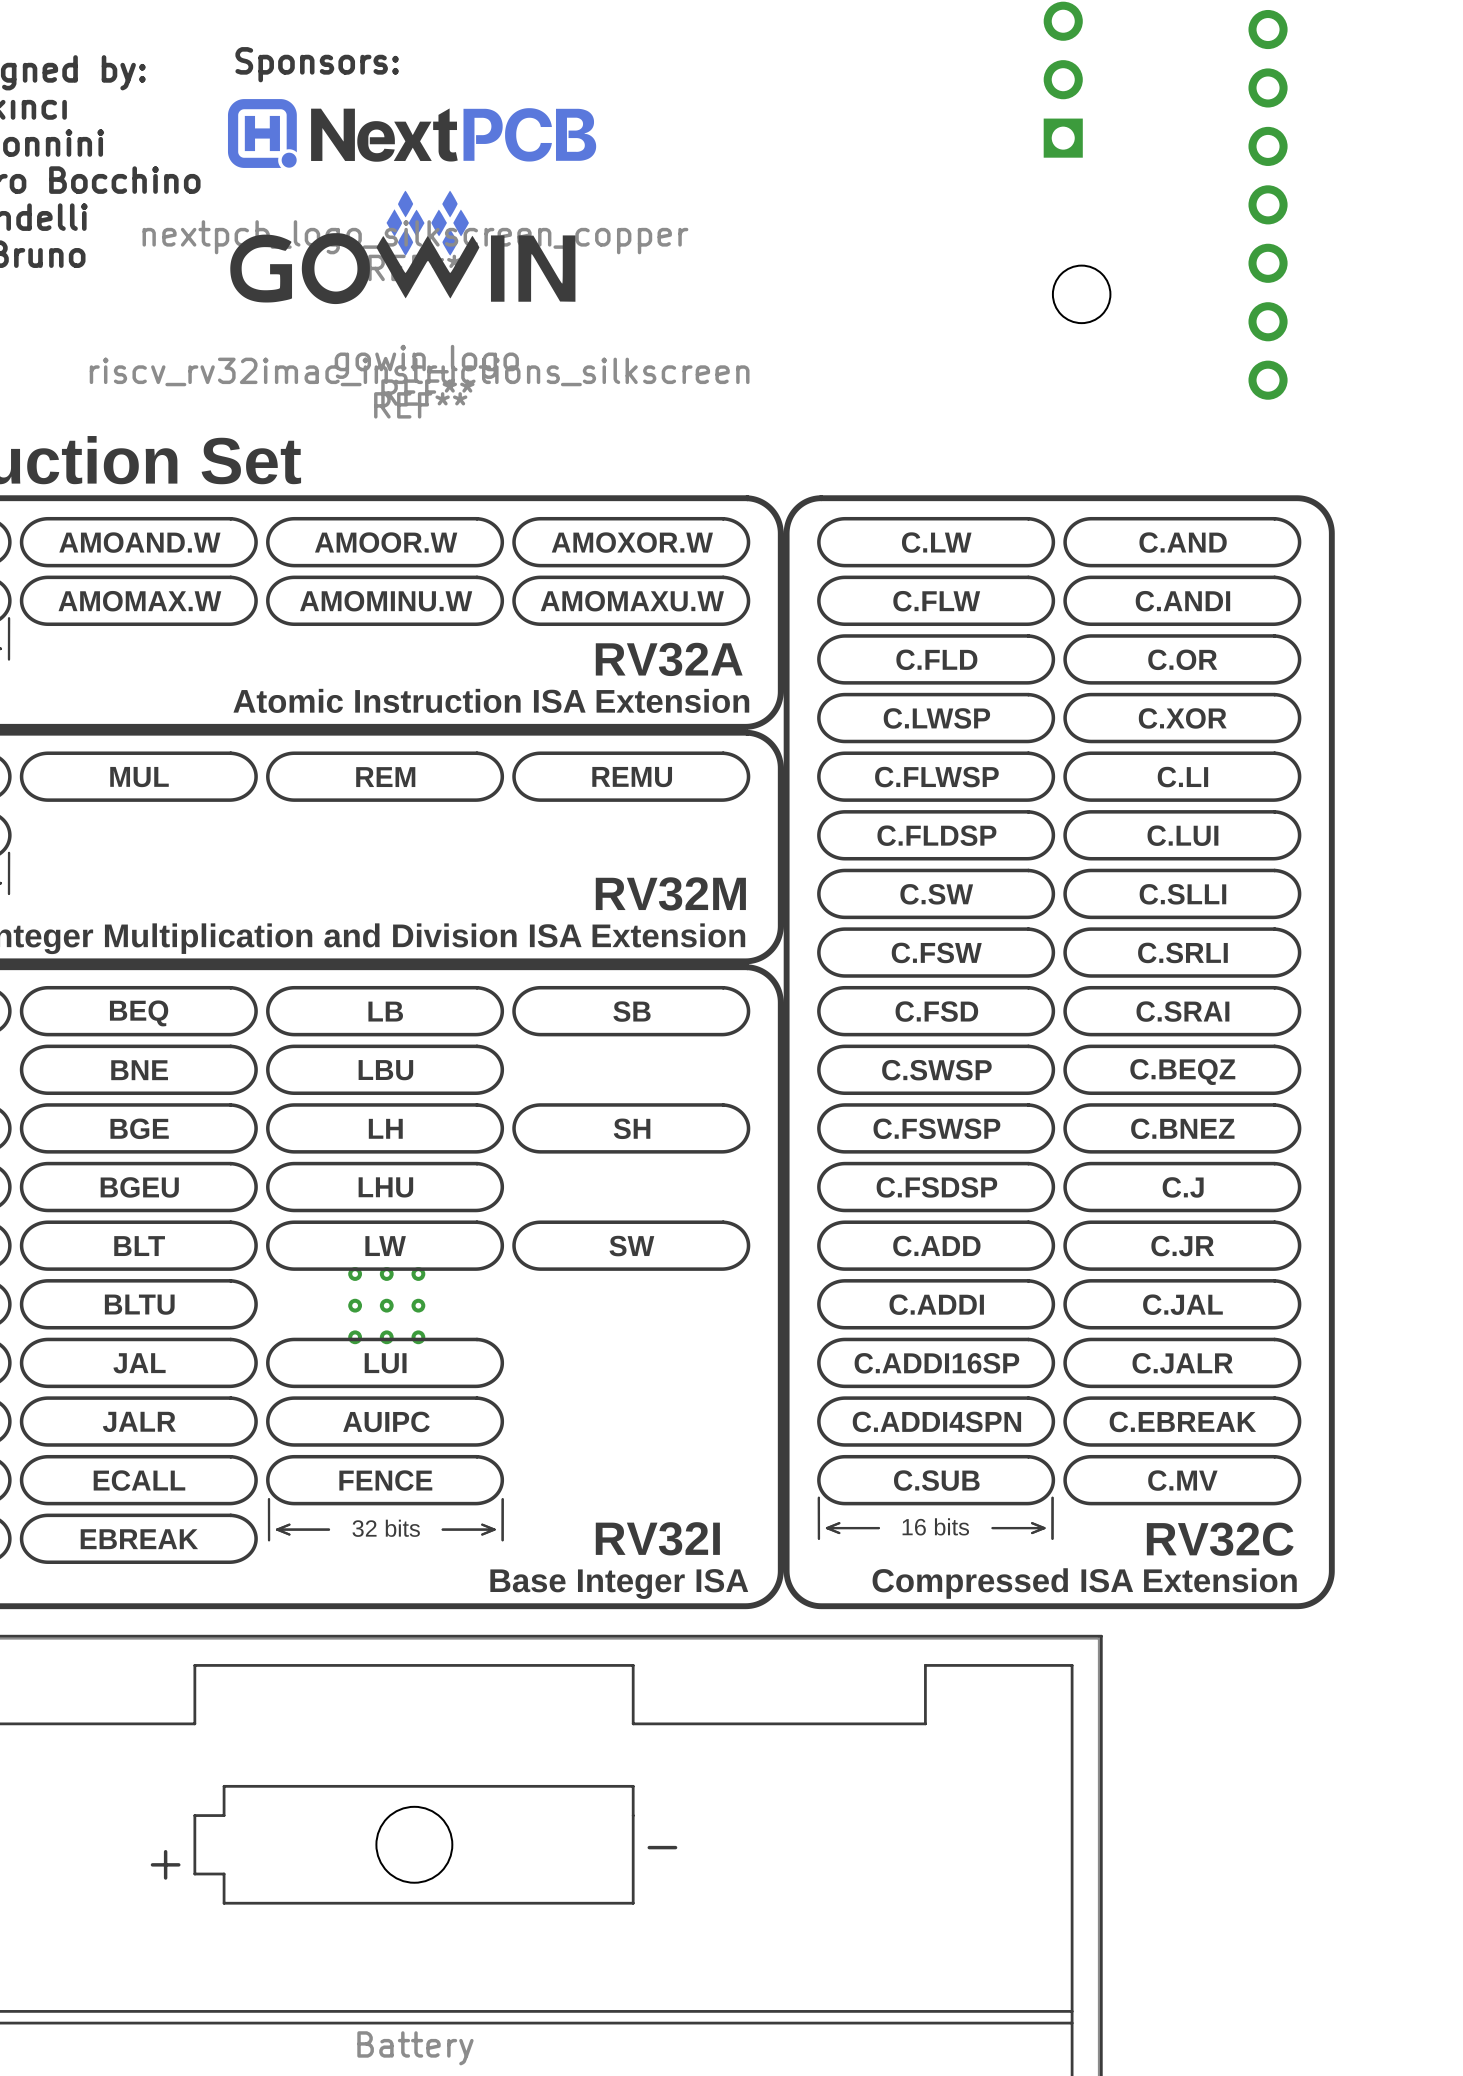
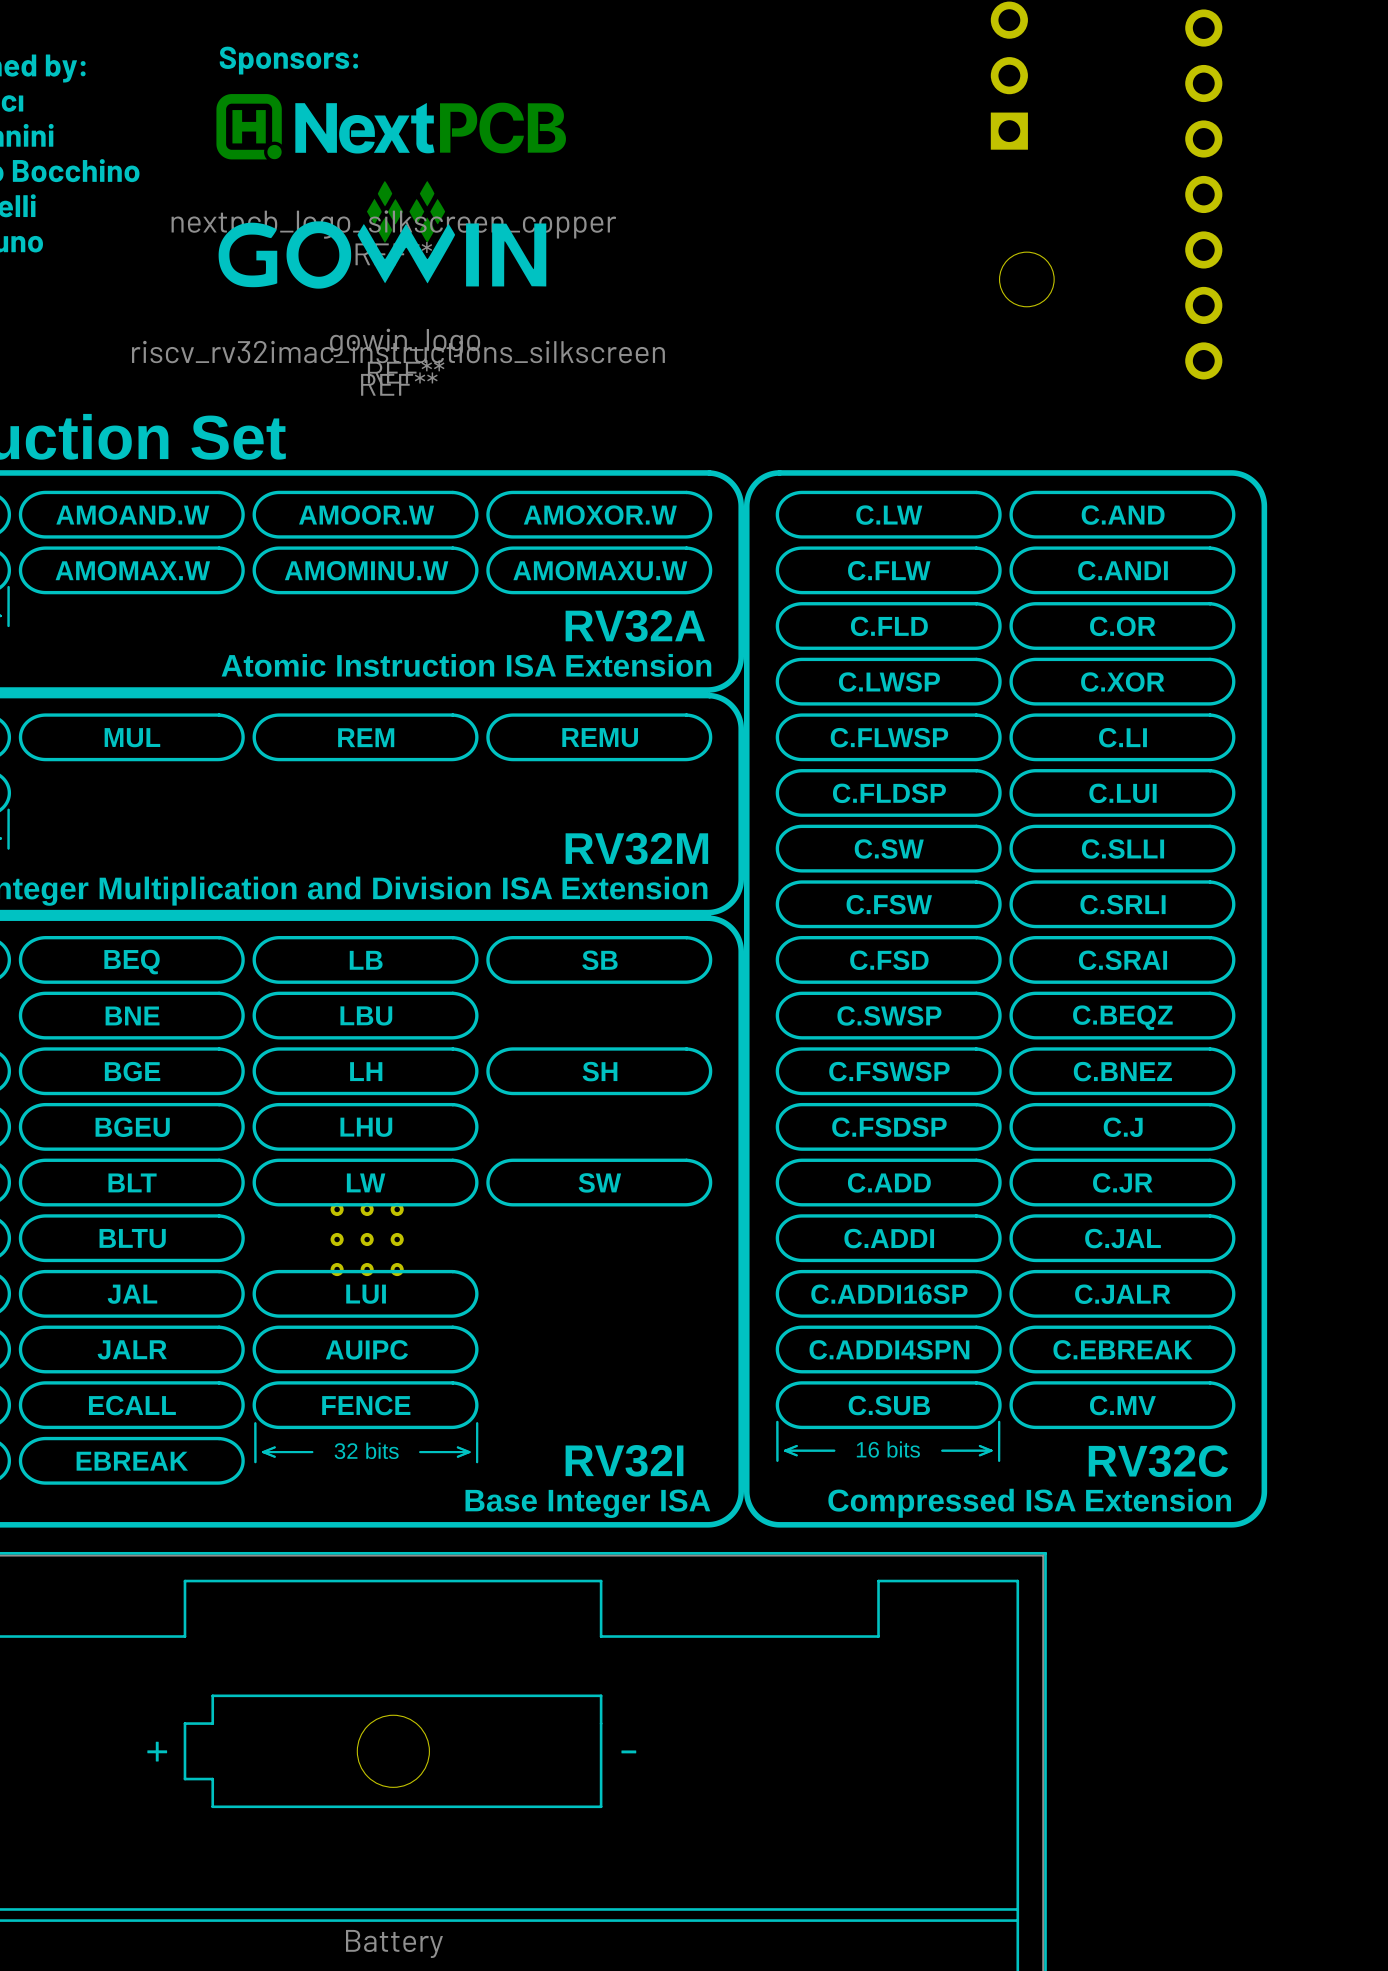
part text position: + (165, 1864) -> + (157, 1751)

